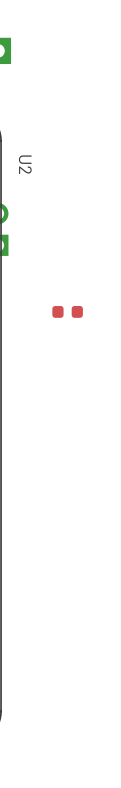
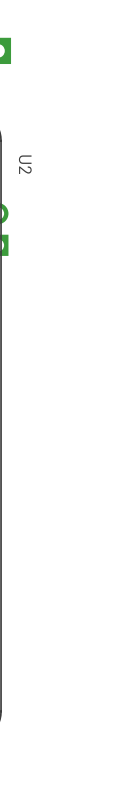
part: (67, 311) -> none

